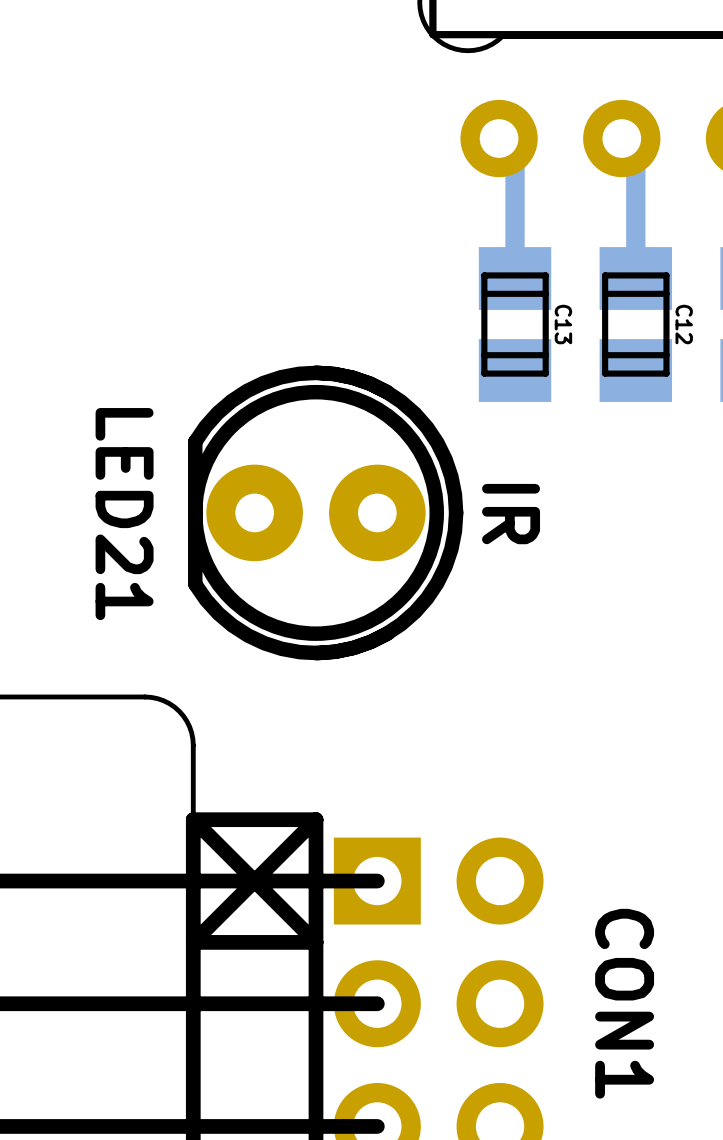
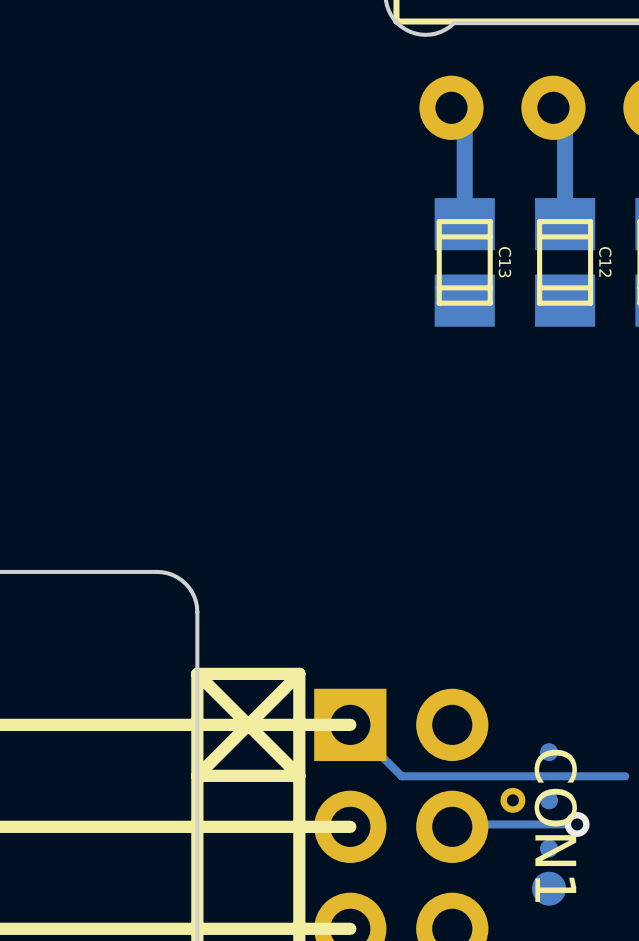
LED21: IR (325, 512) -> none
track: none -> (350, 724) (401, 776) (625, 776)
part: none -> (549, 752)
part: none -> (512, 800)
part: none -> (549, 800)
track: none -> (577, 824) (454, 824) (452, 826)
via: none -> (577, 824)
part: none -> (549, 848)
part: none -> (549, 888)

